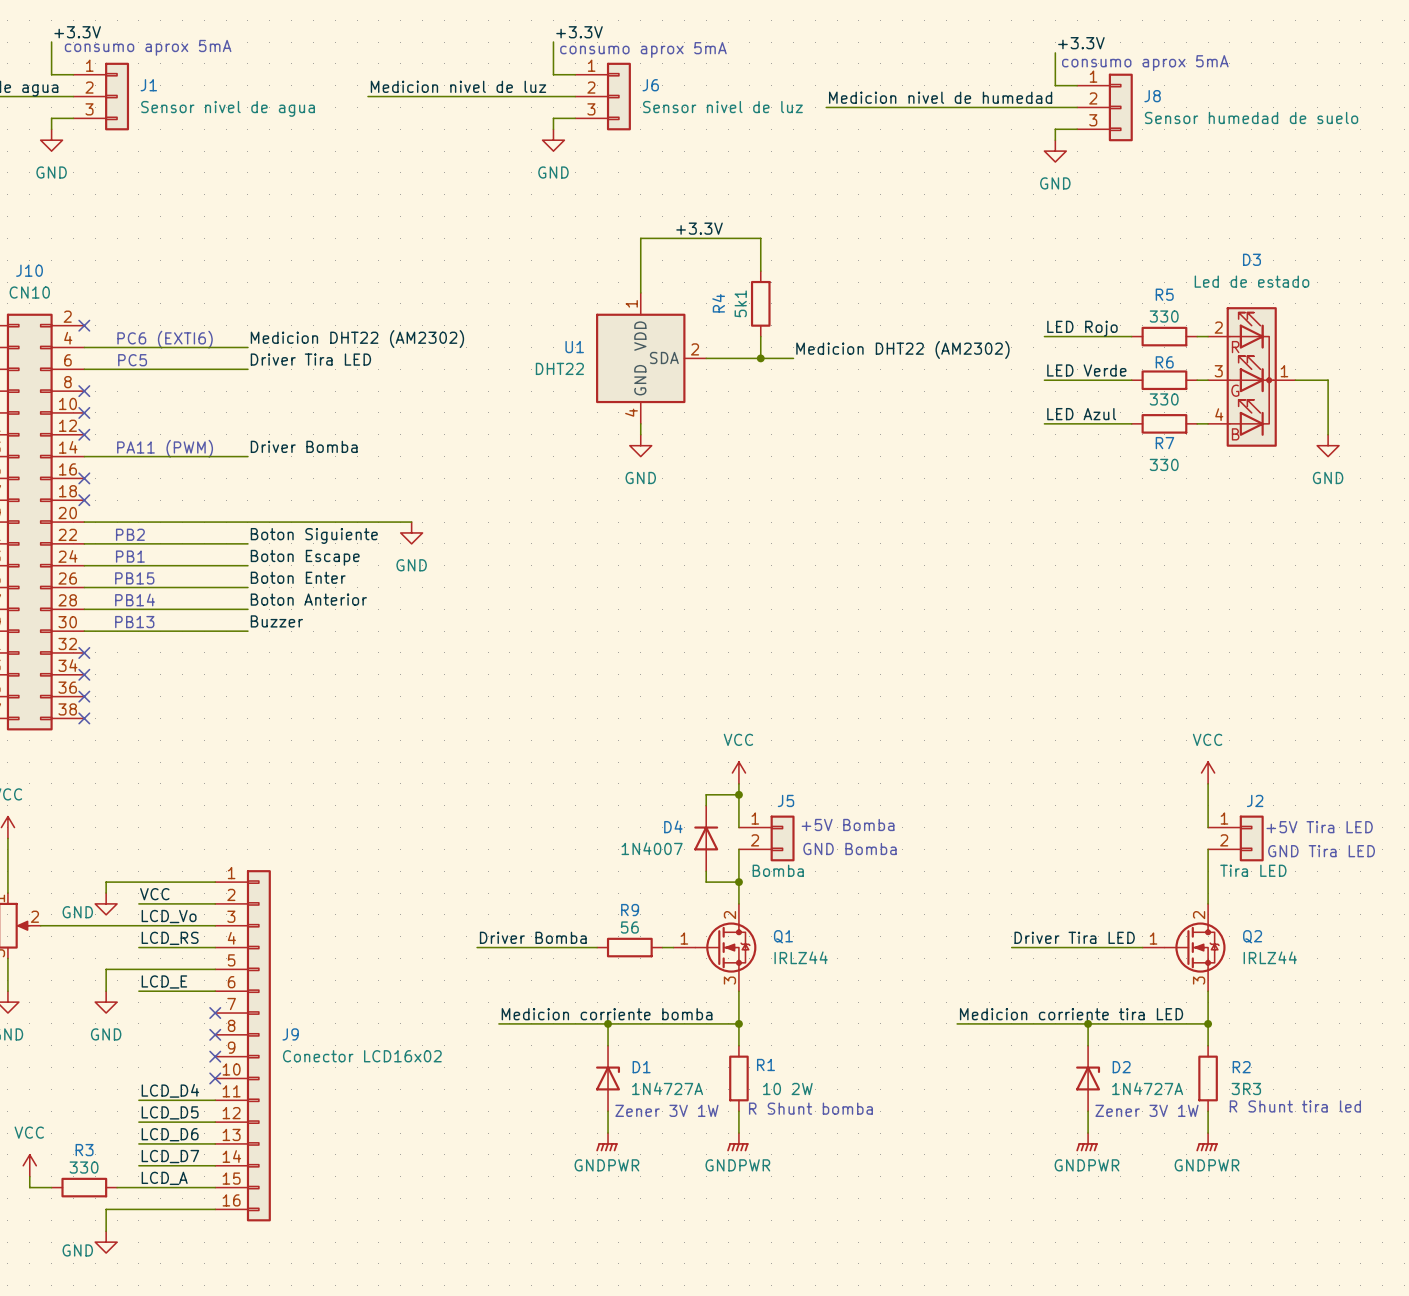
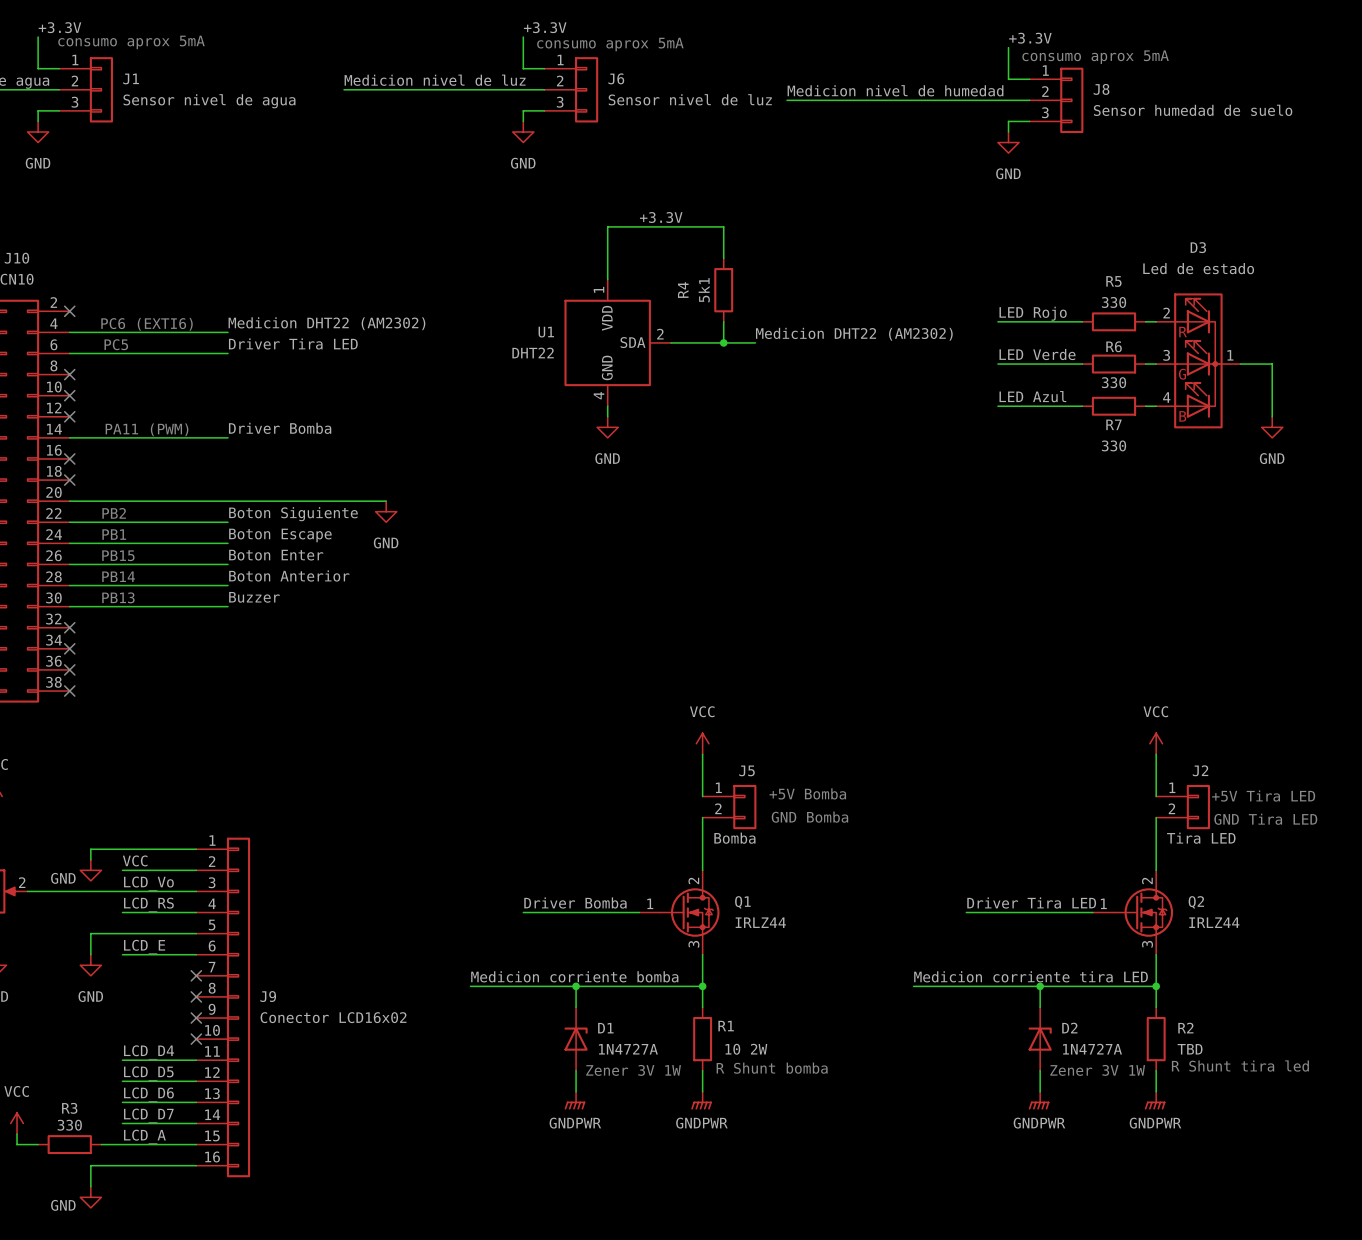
wire: (738, 794) (706, 794) (706, 805) -> none
junction: (738, 794) -> none
D4: 1N4007 (706, 838) -> none
wire: (706, 871) (706, 882) (738, 882) -> none
junction: (738, 882) -> none
label position: Driver Bomba (533, 937) -> Driver Bomba (575, 903)
wire: (477, 947) (553, 947) -> none
wire: none -> (565, 912) (628, 912)
R9: 56 (629, 947) -> none
R2 value: 3R3 (1246, 1088) -> TBD (1190, 1049)

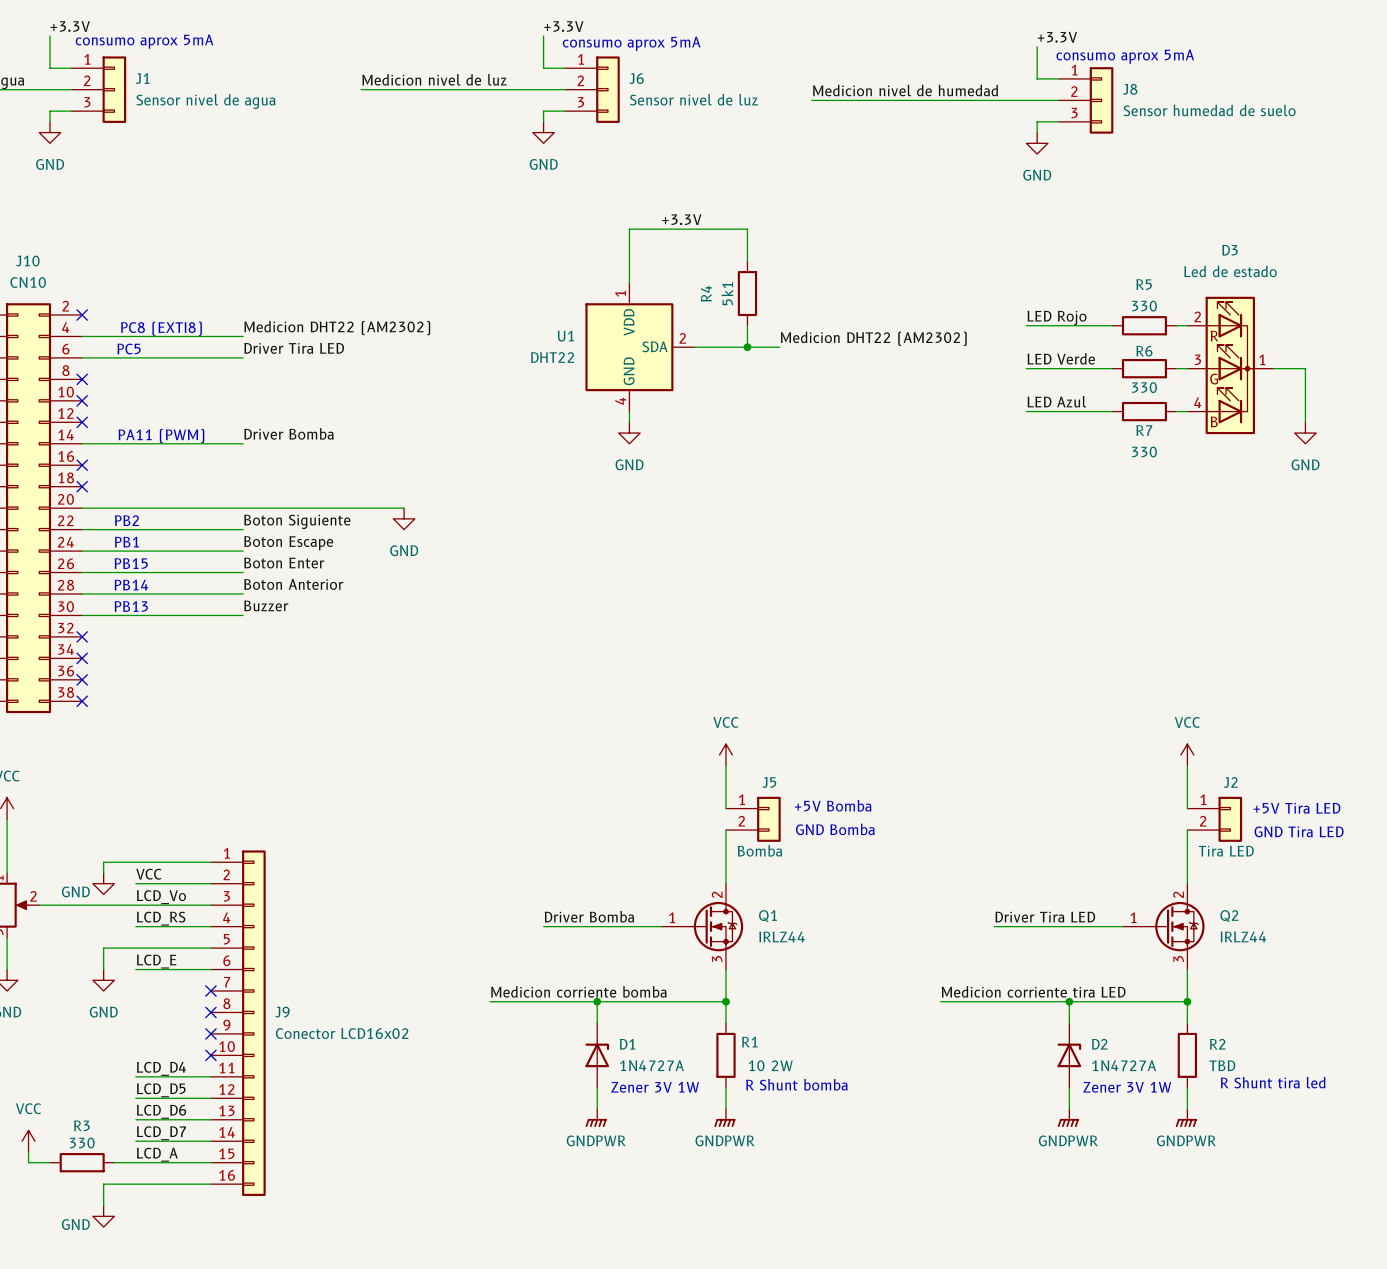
text: PC6 (EXTI6) (147, 324) -> PC8 (EXTI8) (161, 328)

